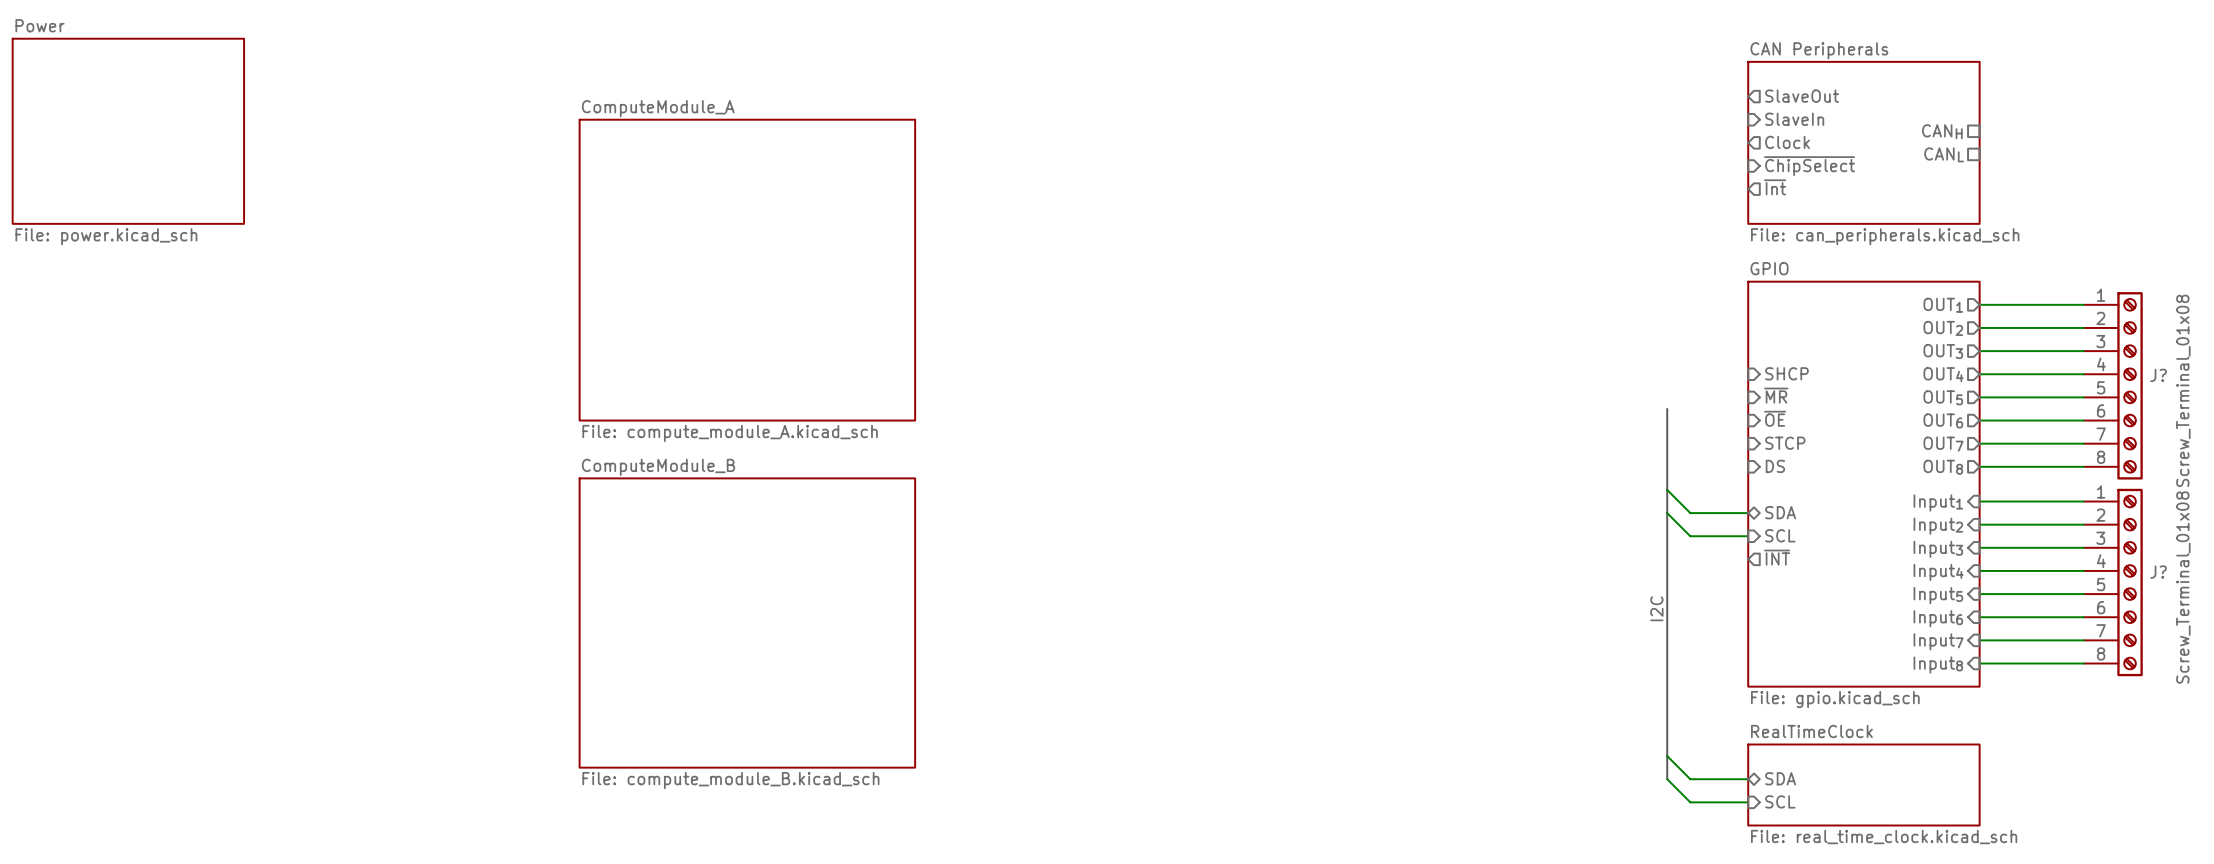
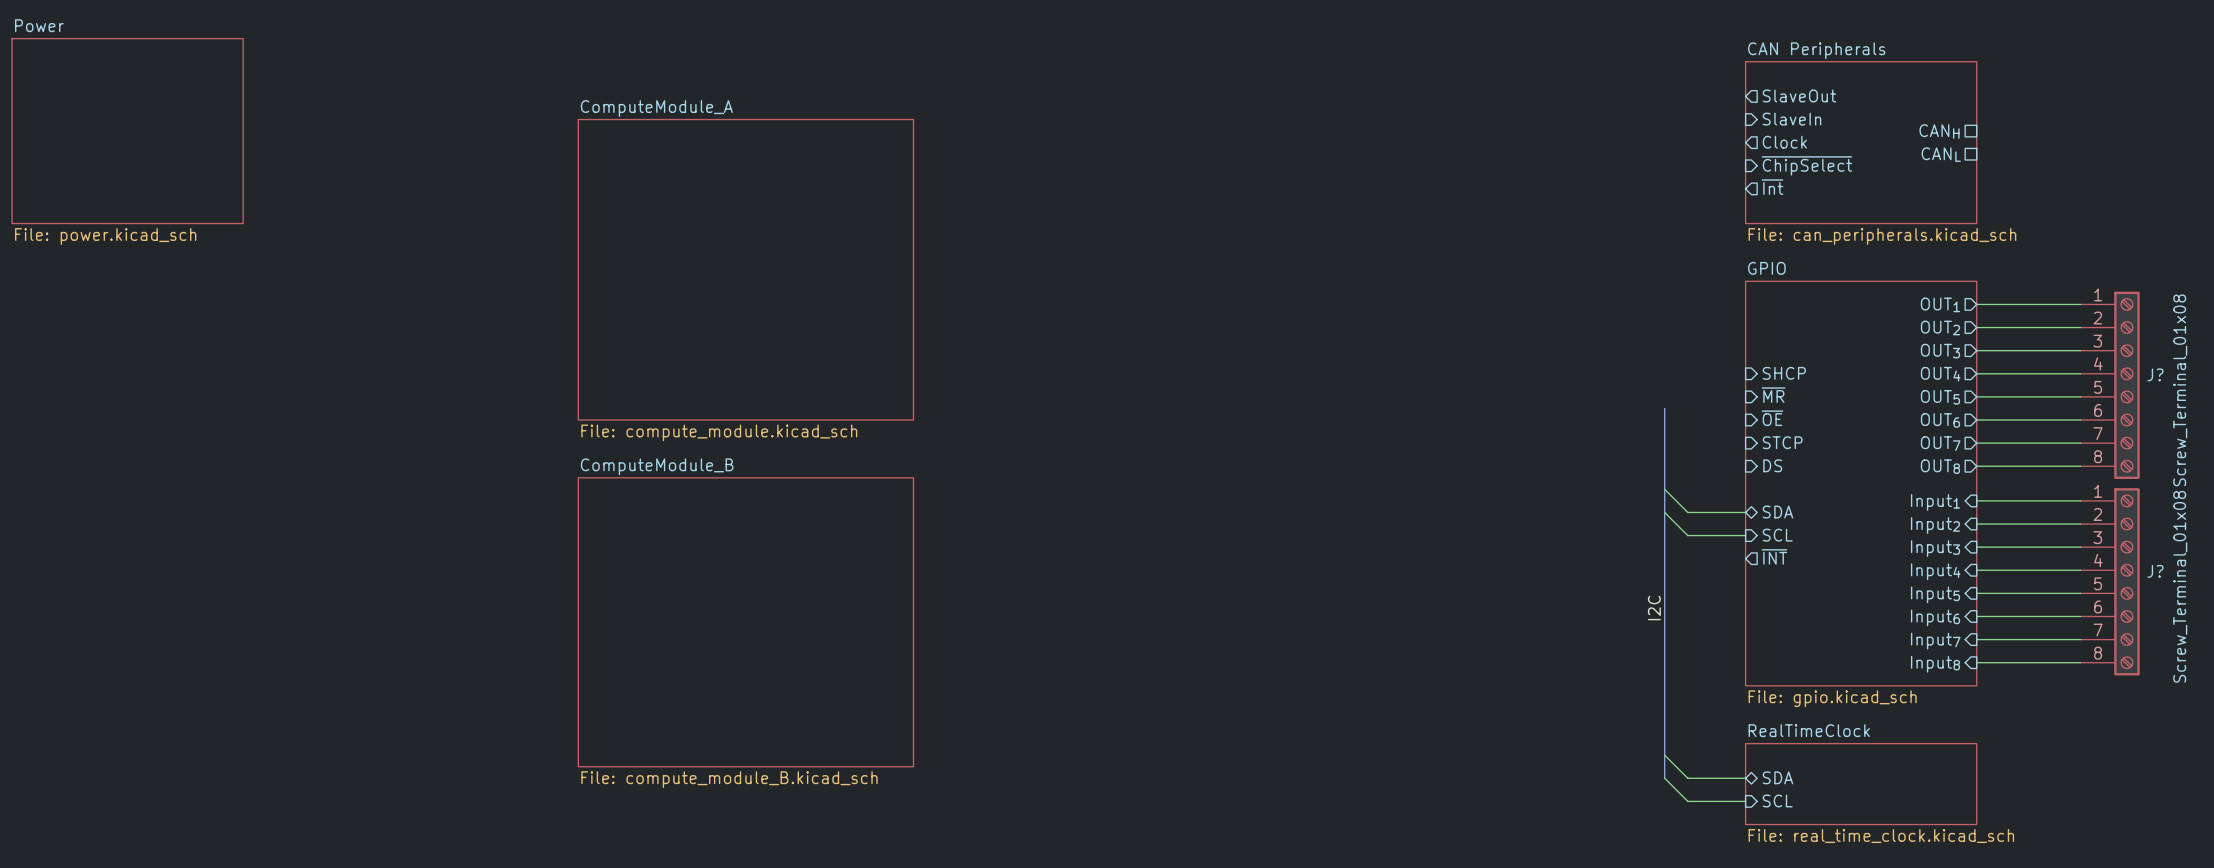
sheet ComputeModule_A value: File: compute_module_A.kicad_sch (730, 433) -> File: compute_module.kicad_sch (719, 432)

